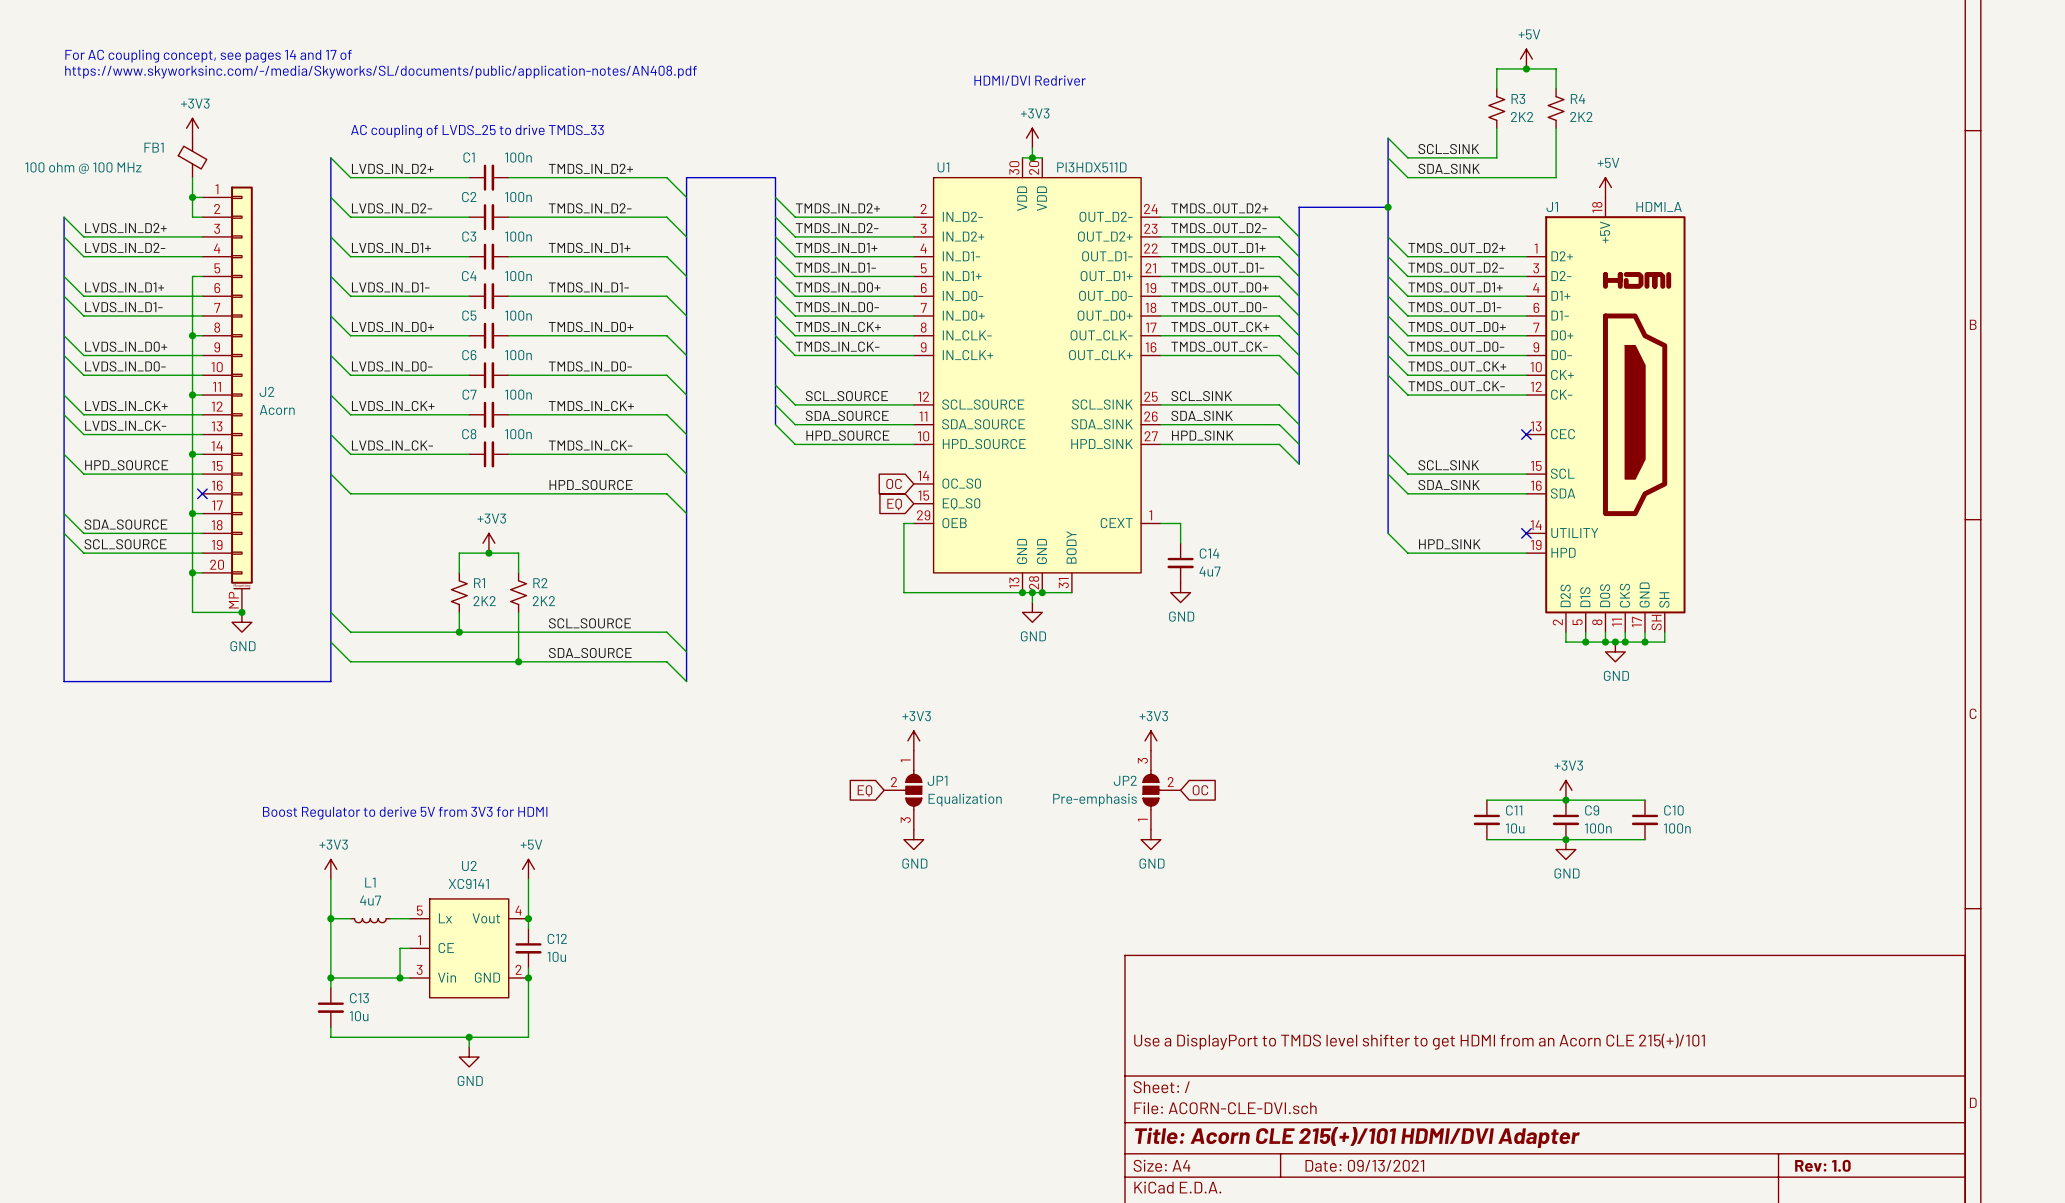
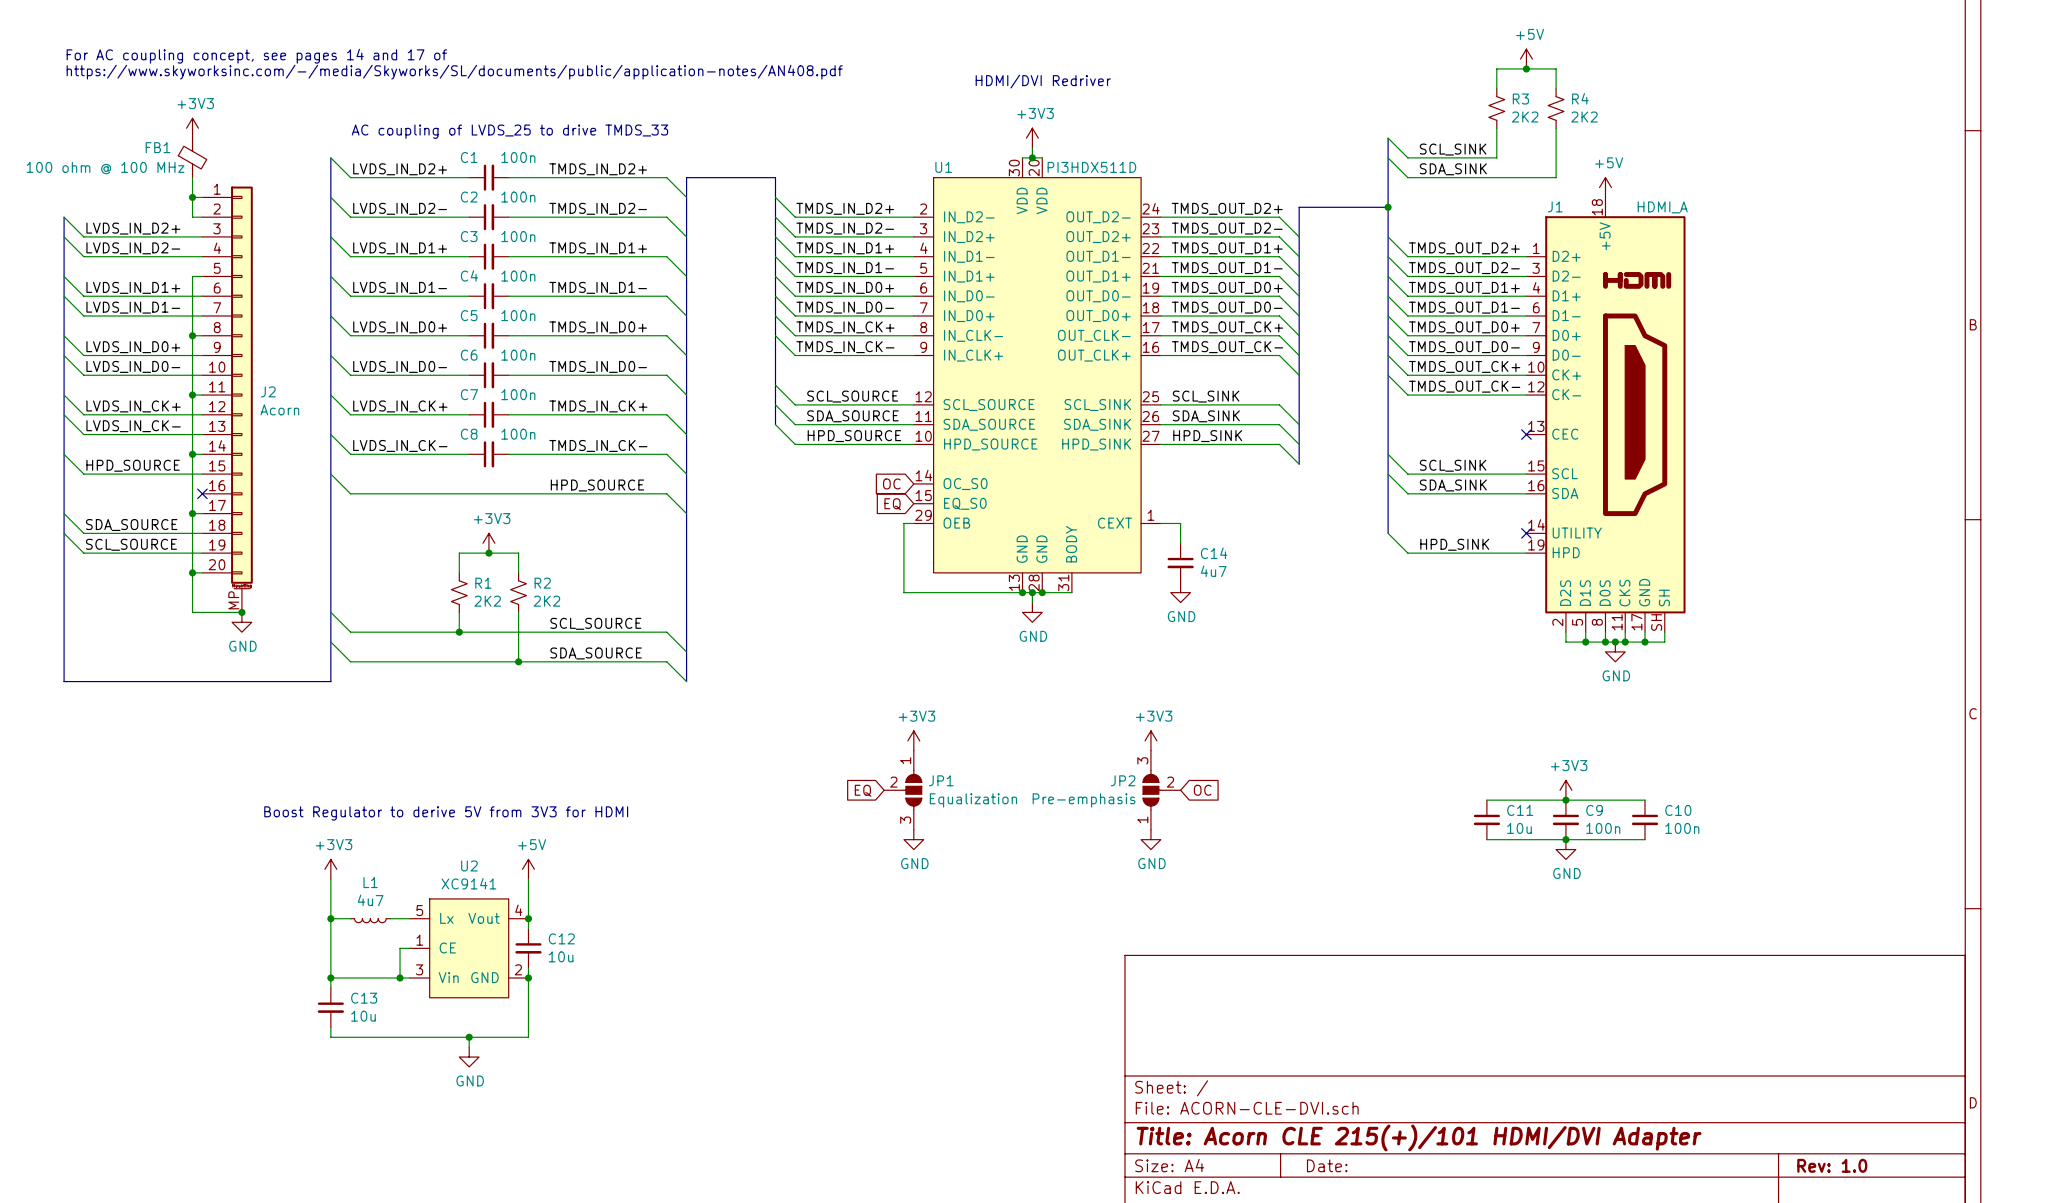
title block: Use a DisplayPort to TMDS level shifter to get HDMI from an Acorn CLE 215(+)/101 (1419, 1041) -> none
title block: Date: 09/13/2021 (1364, 1165) -> Date: (1327, 1165)

